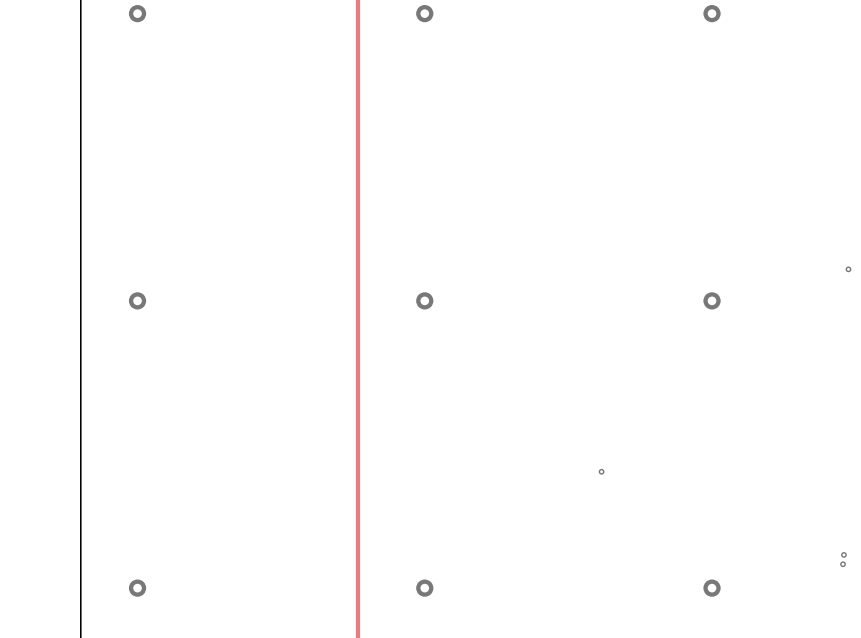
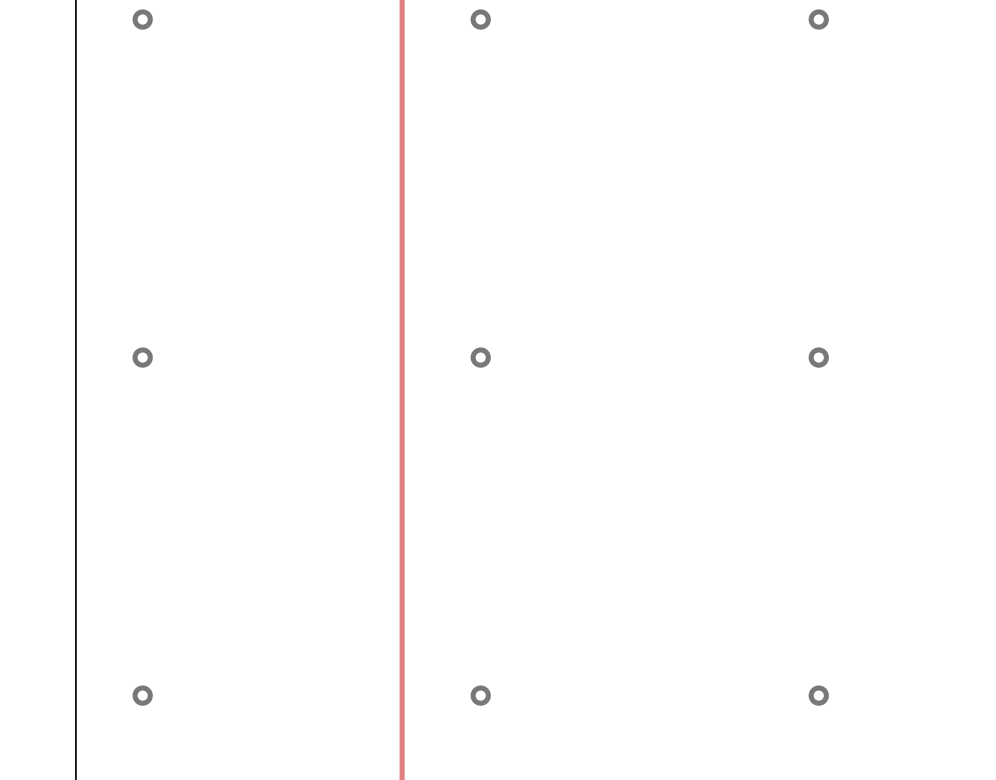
via: (848, 269) -> none
via: (601, 471) -> none
via: (843, 554) -> none
via: (843, 564) -> none

